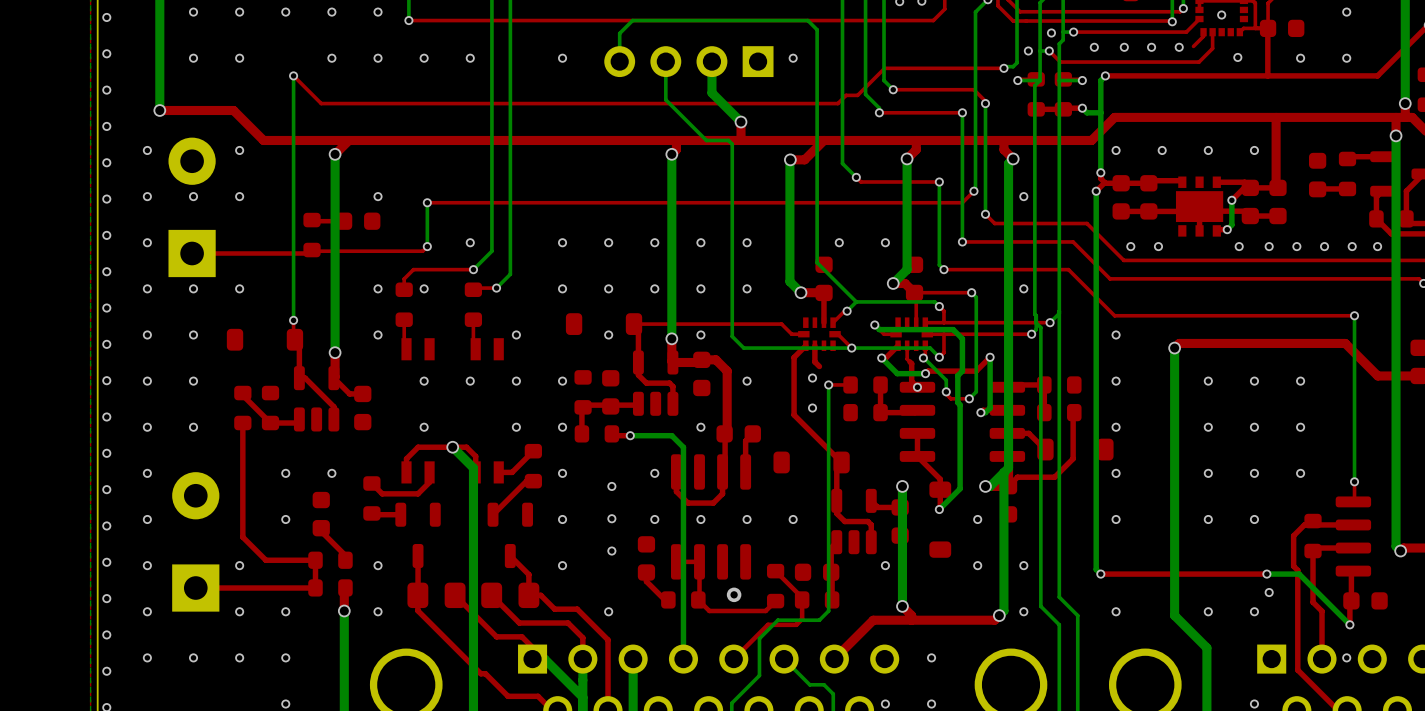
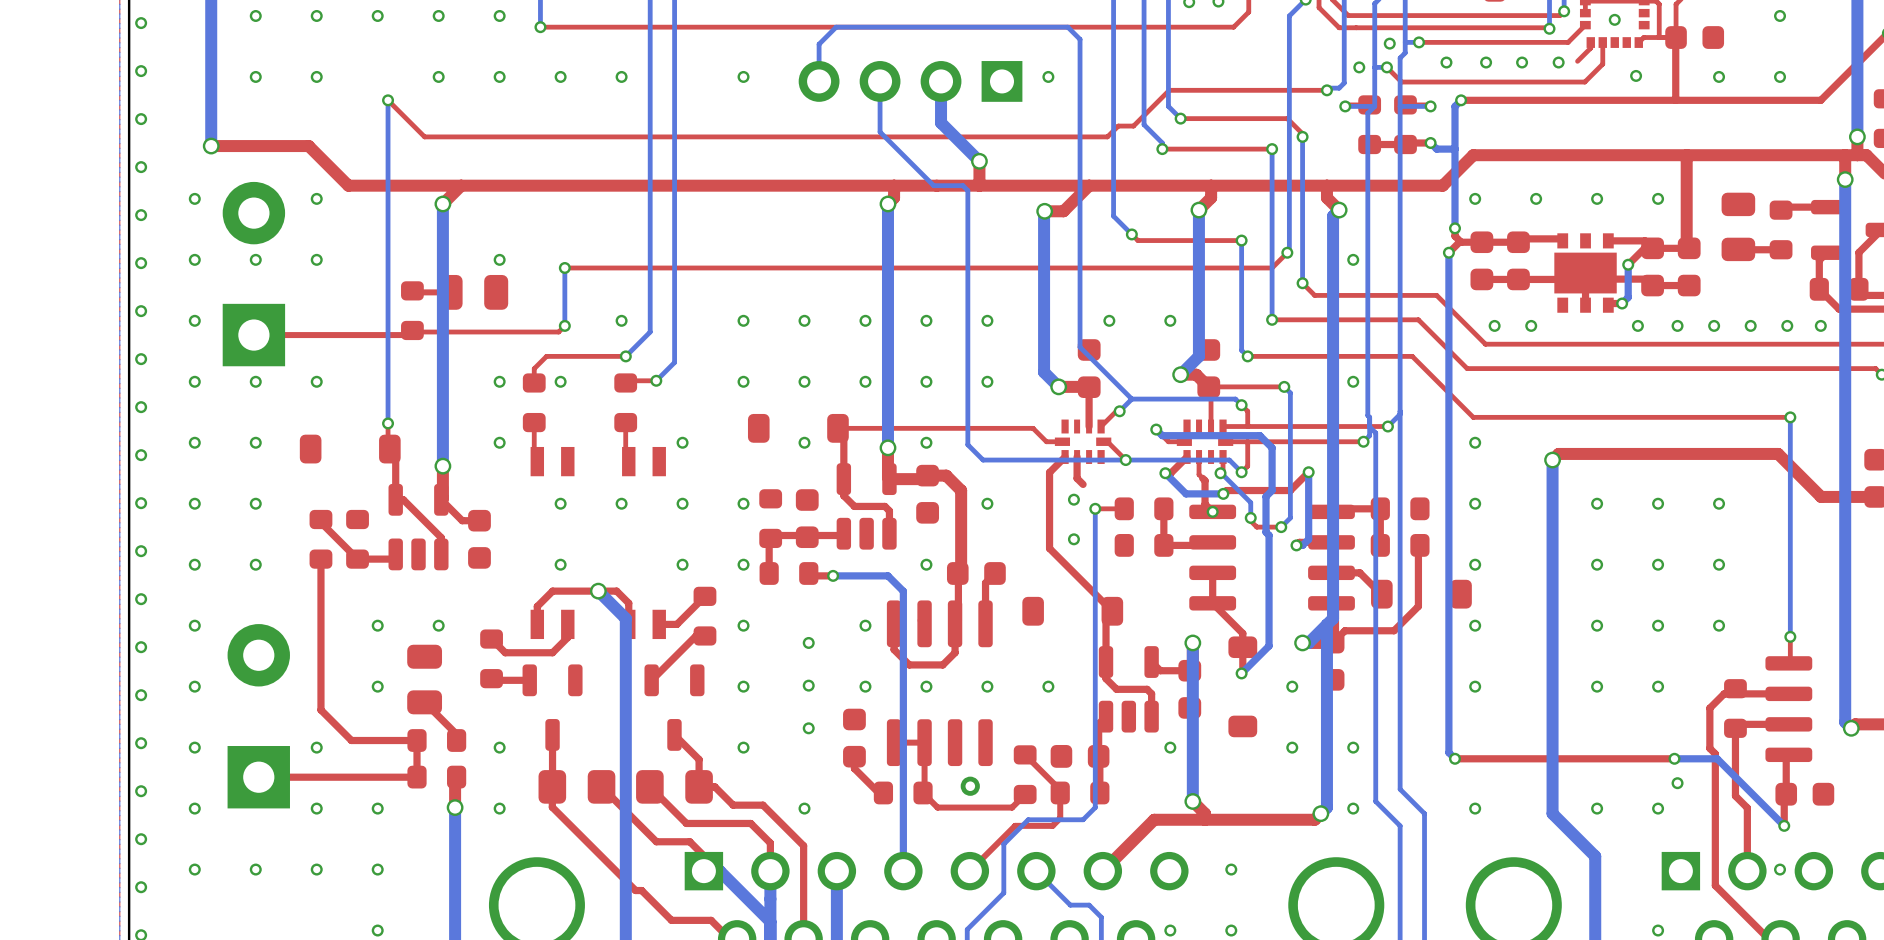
part footprint: [1308, 152, 1327, 198] -> [1721, 192, 1756, 262]
part footprint: [335, 212, 381, 230] -> [438, 274, 509, 310]
part footprint: [312, 491, 330, 537] -> [407, 644, 443, 715]

